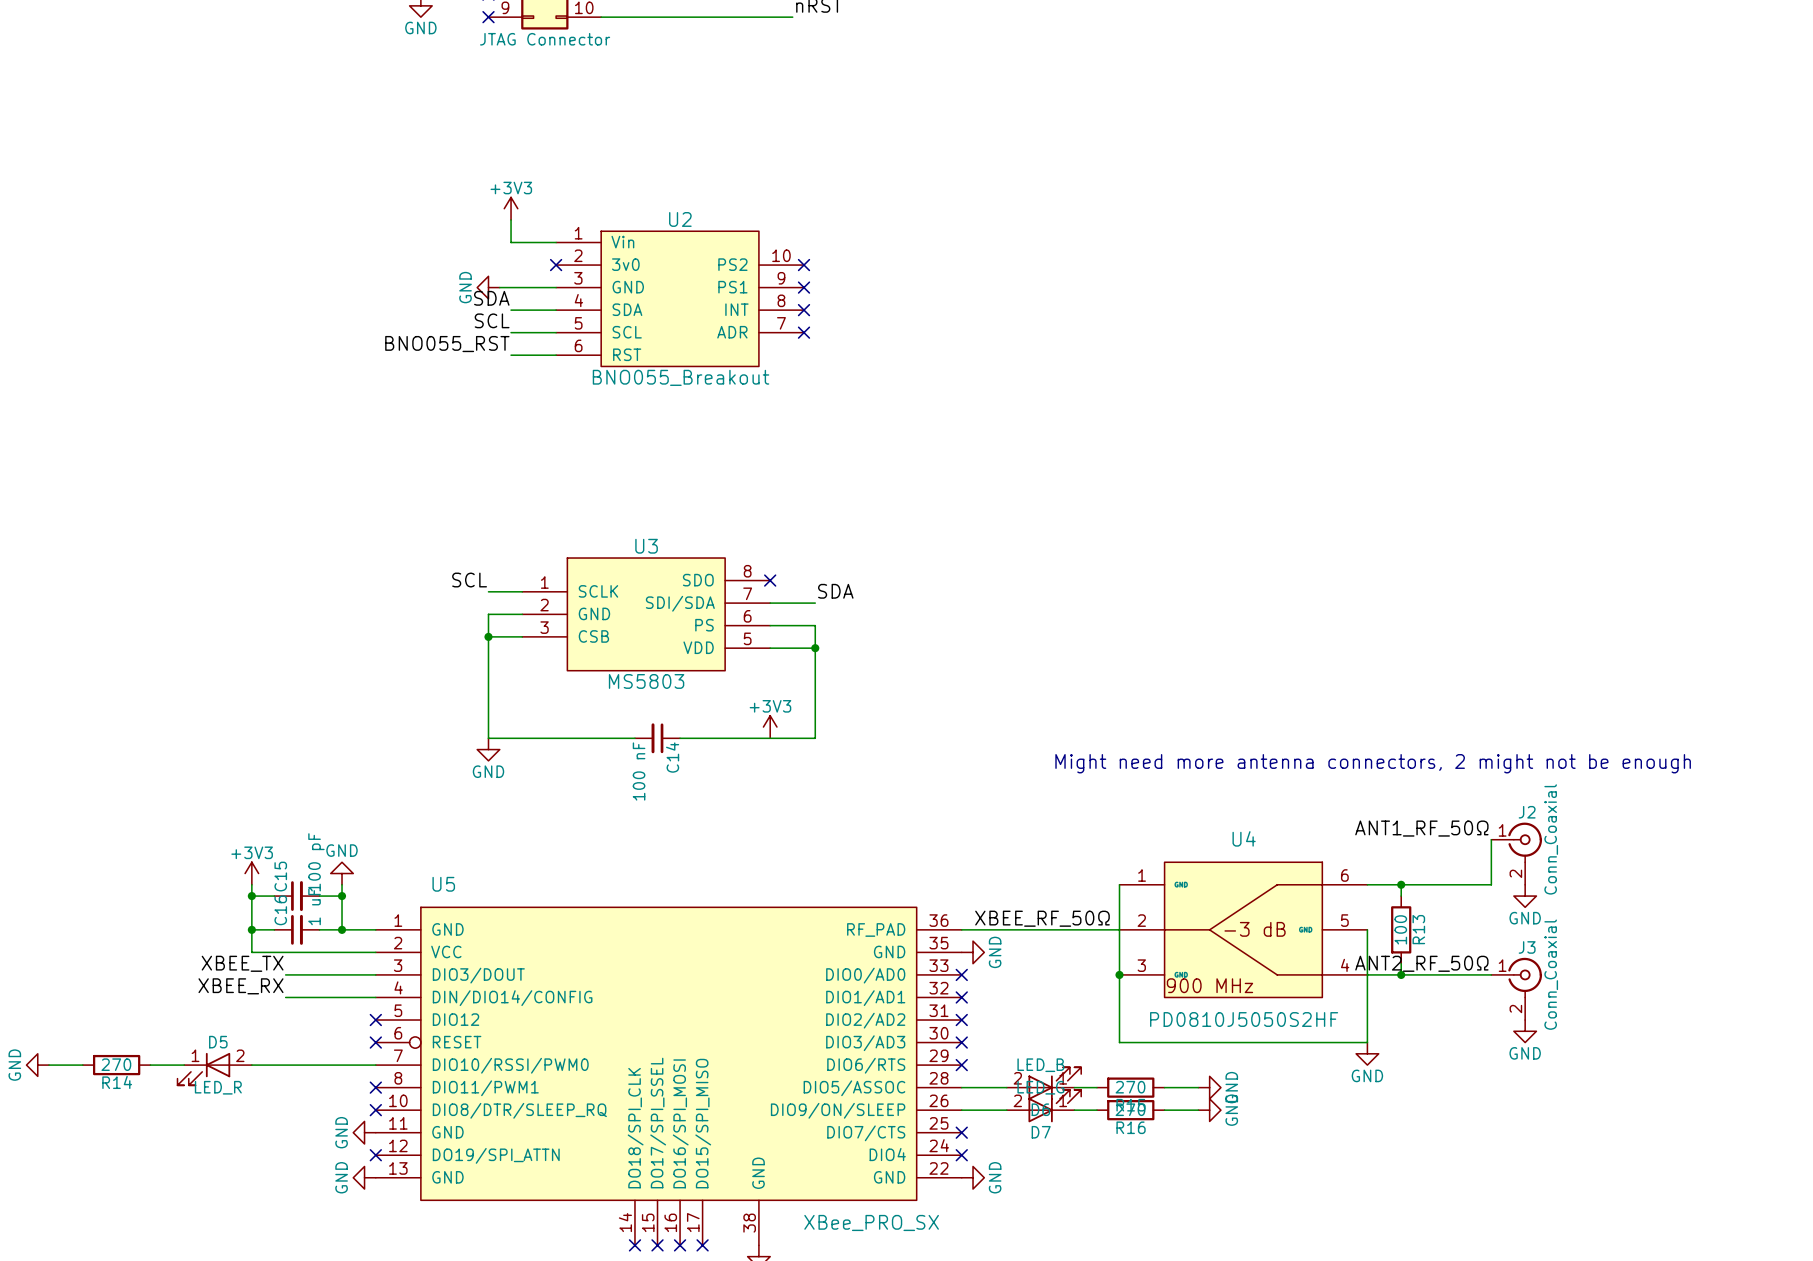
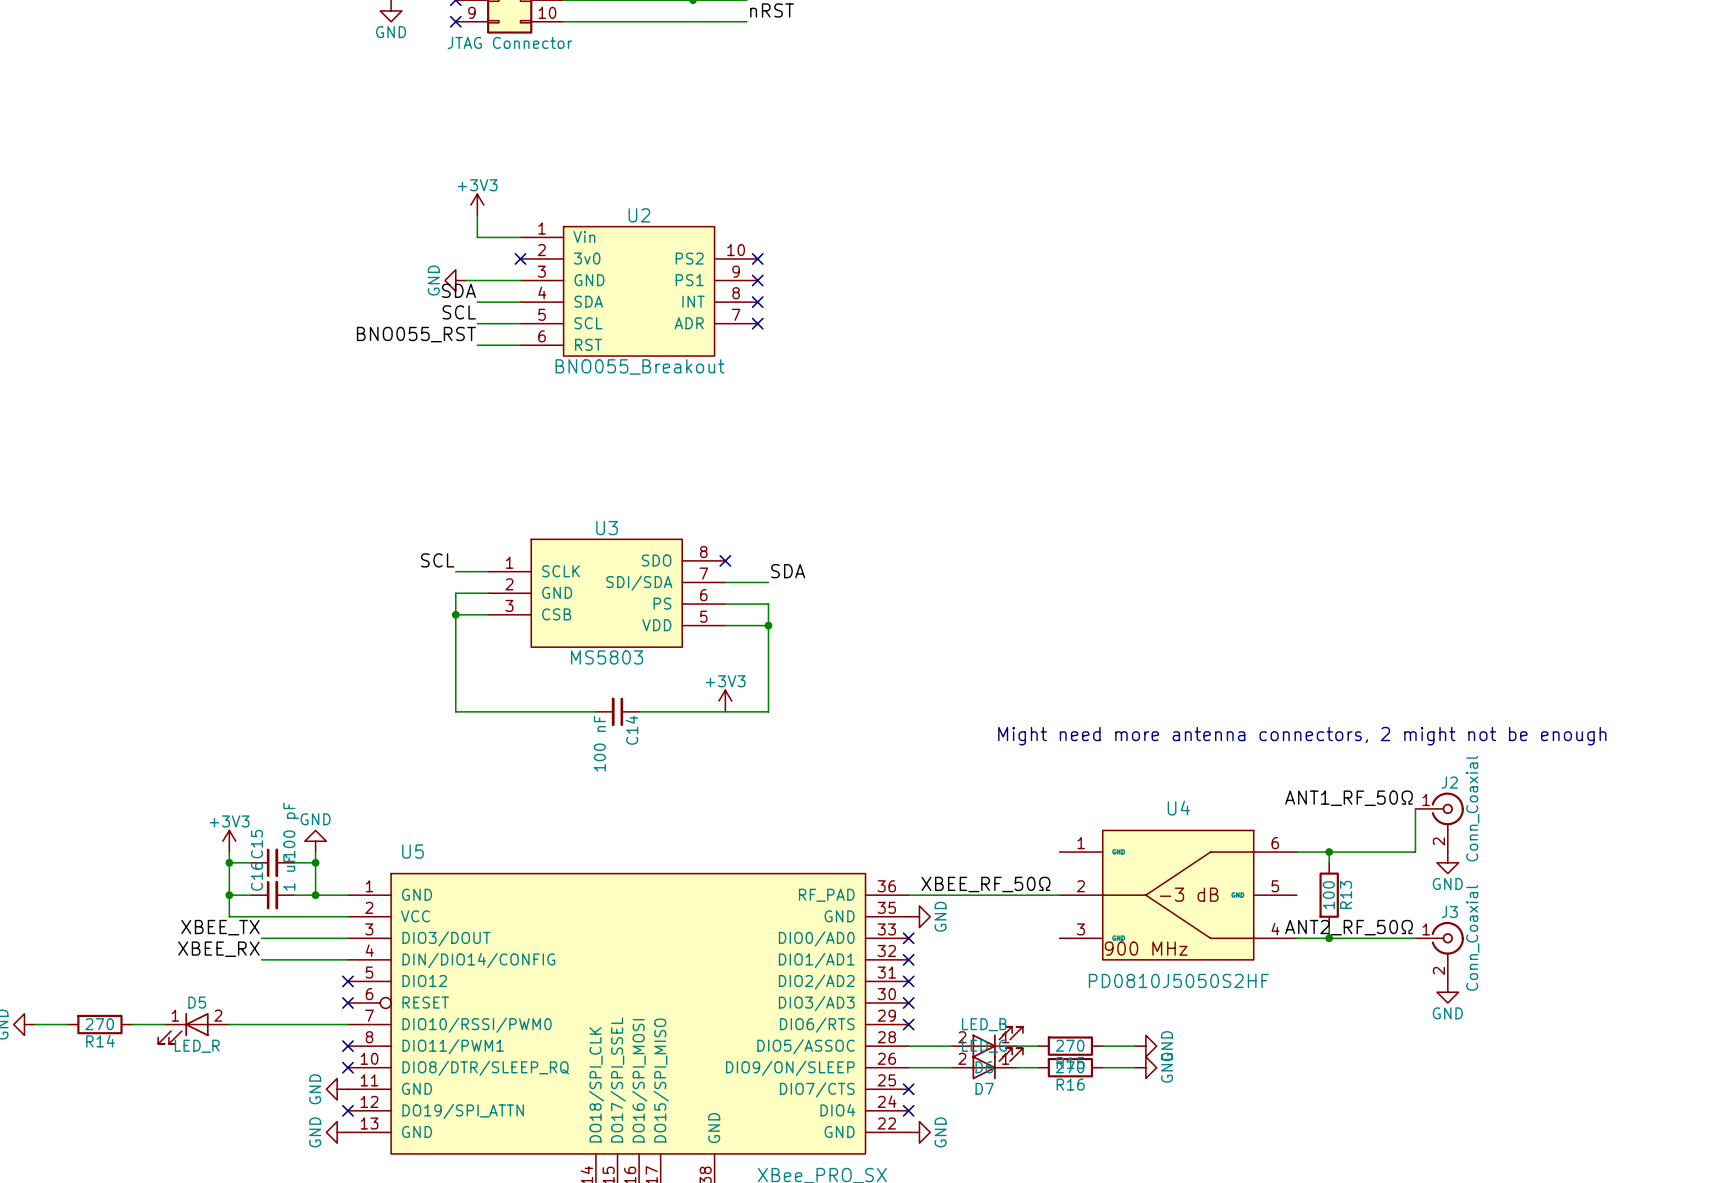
power symbol: GND (488, 749) -> none
wire: (1119, 884) (1119, 1042) (1367, 1042) (1367, 929) -> none
junction: (1119, 974) -> none
power symbol: GND (1367, 1053) -> none

